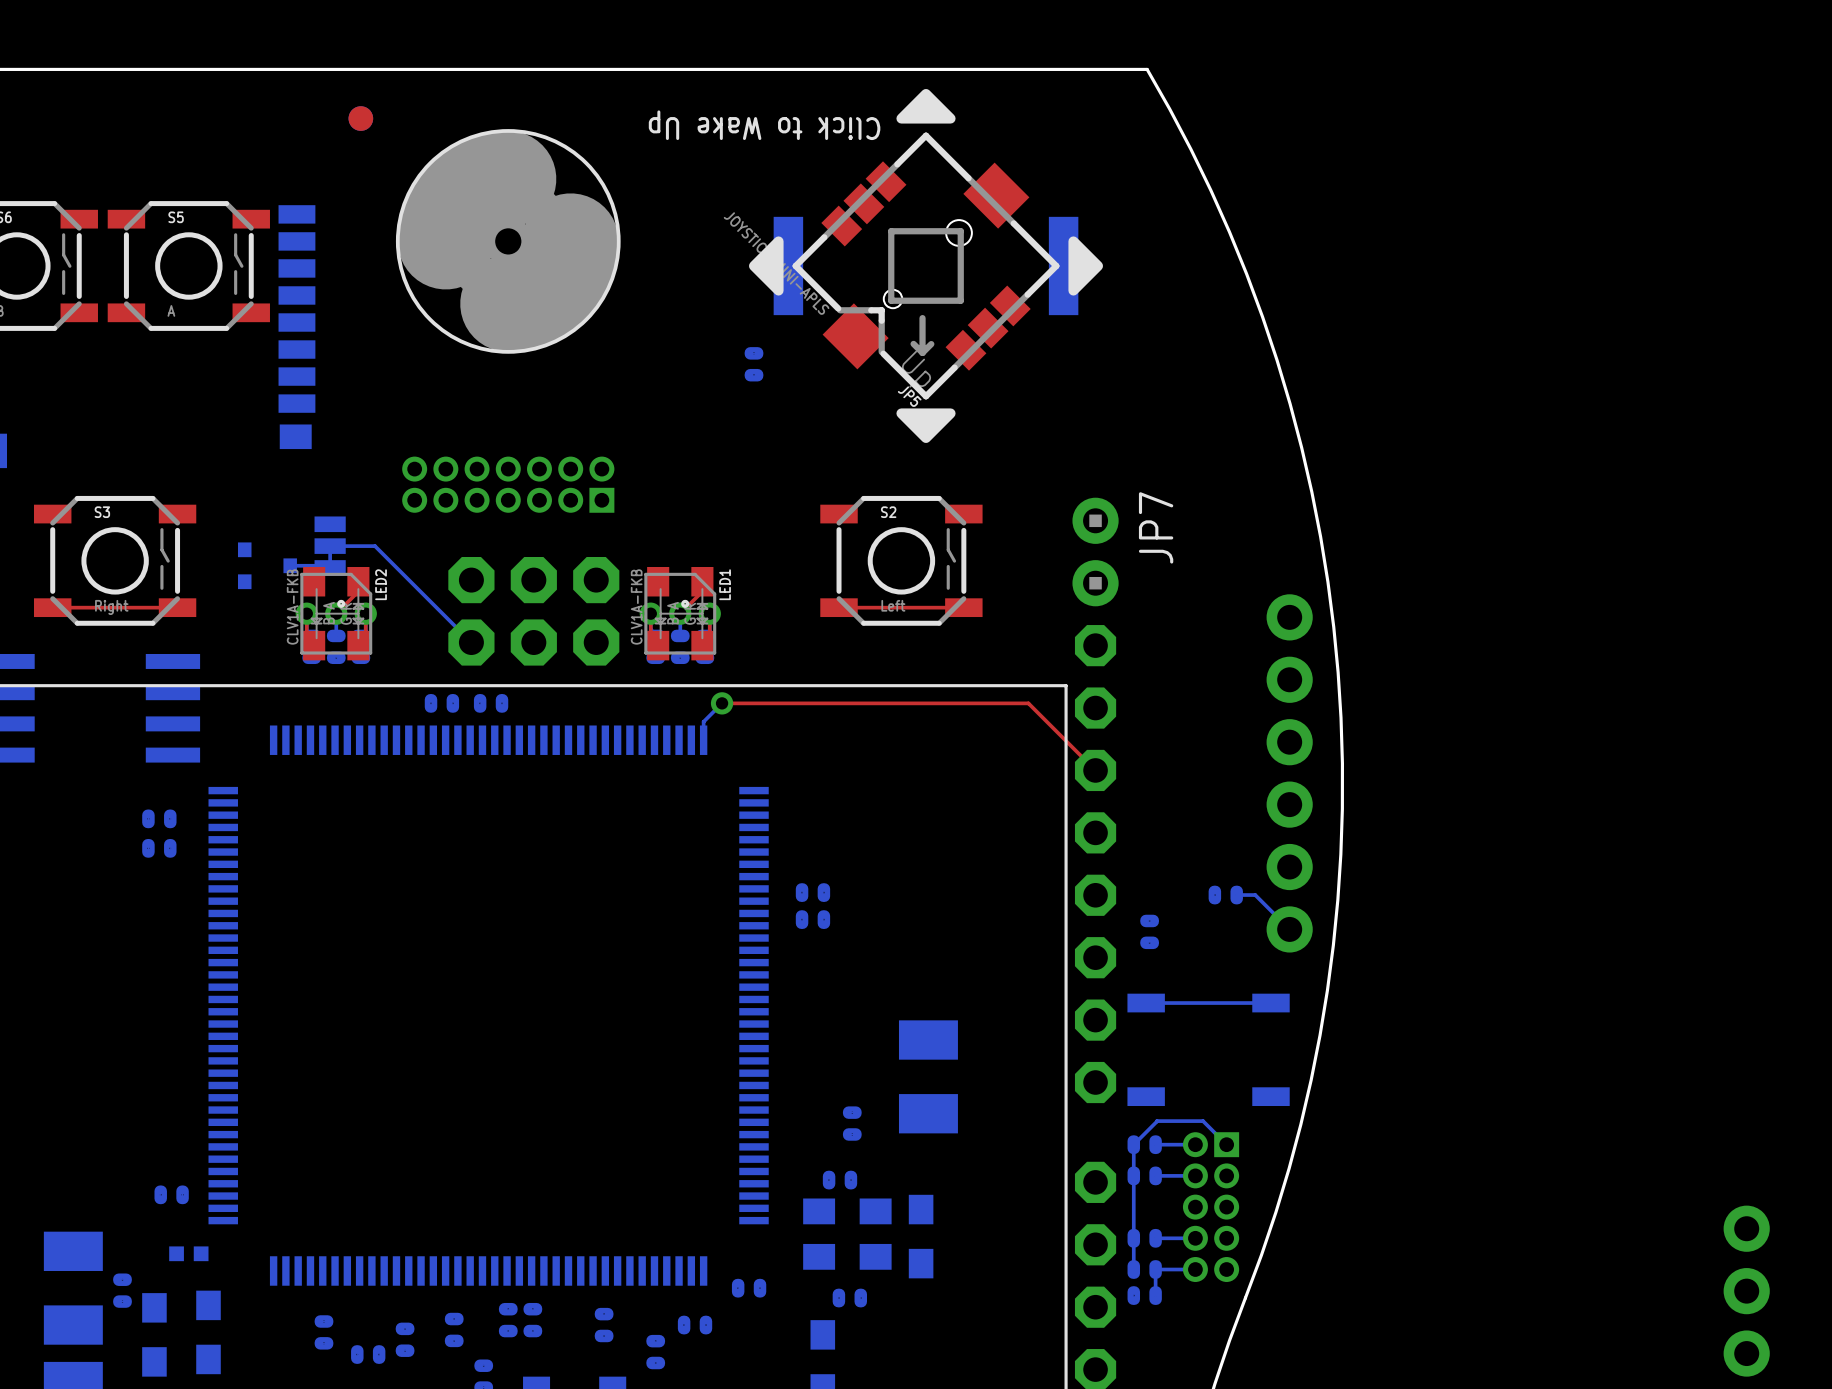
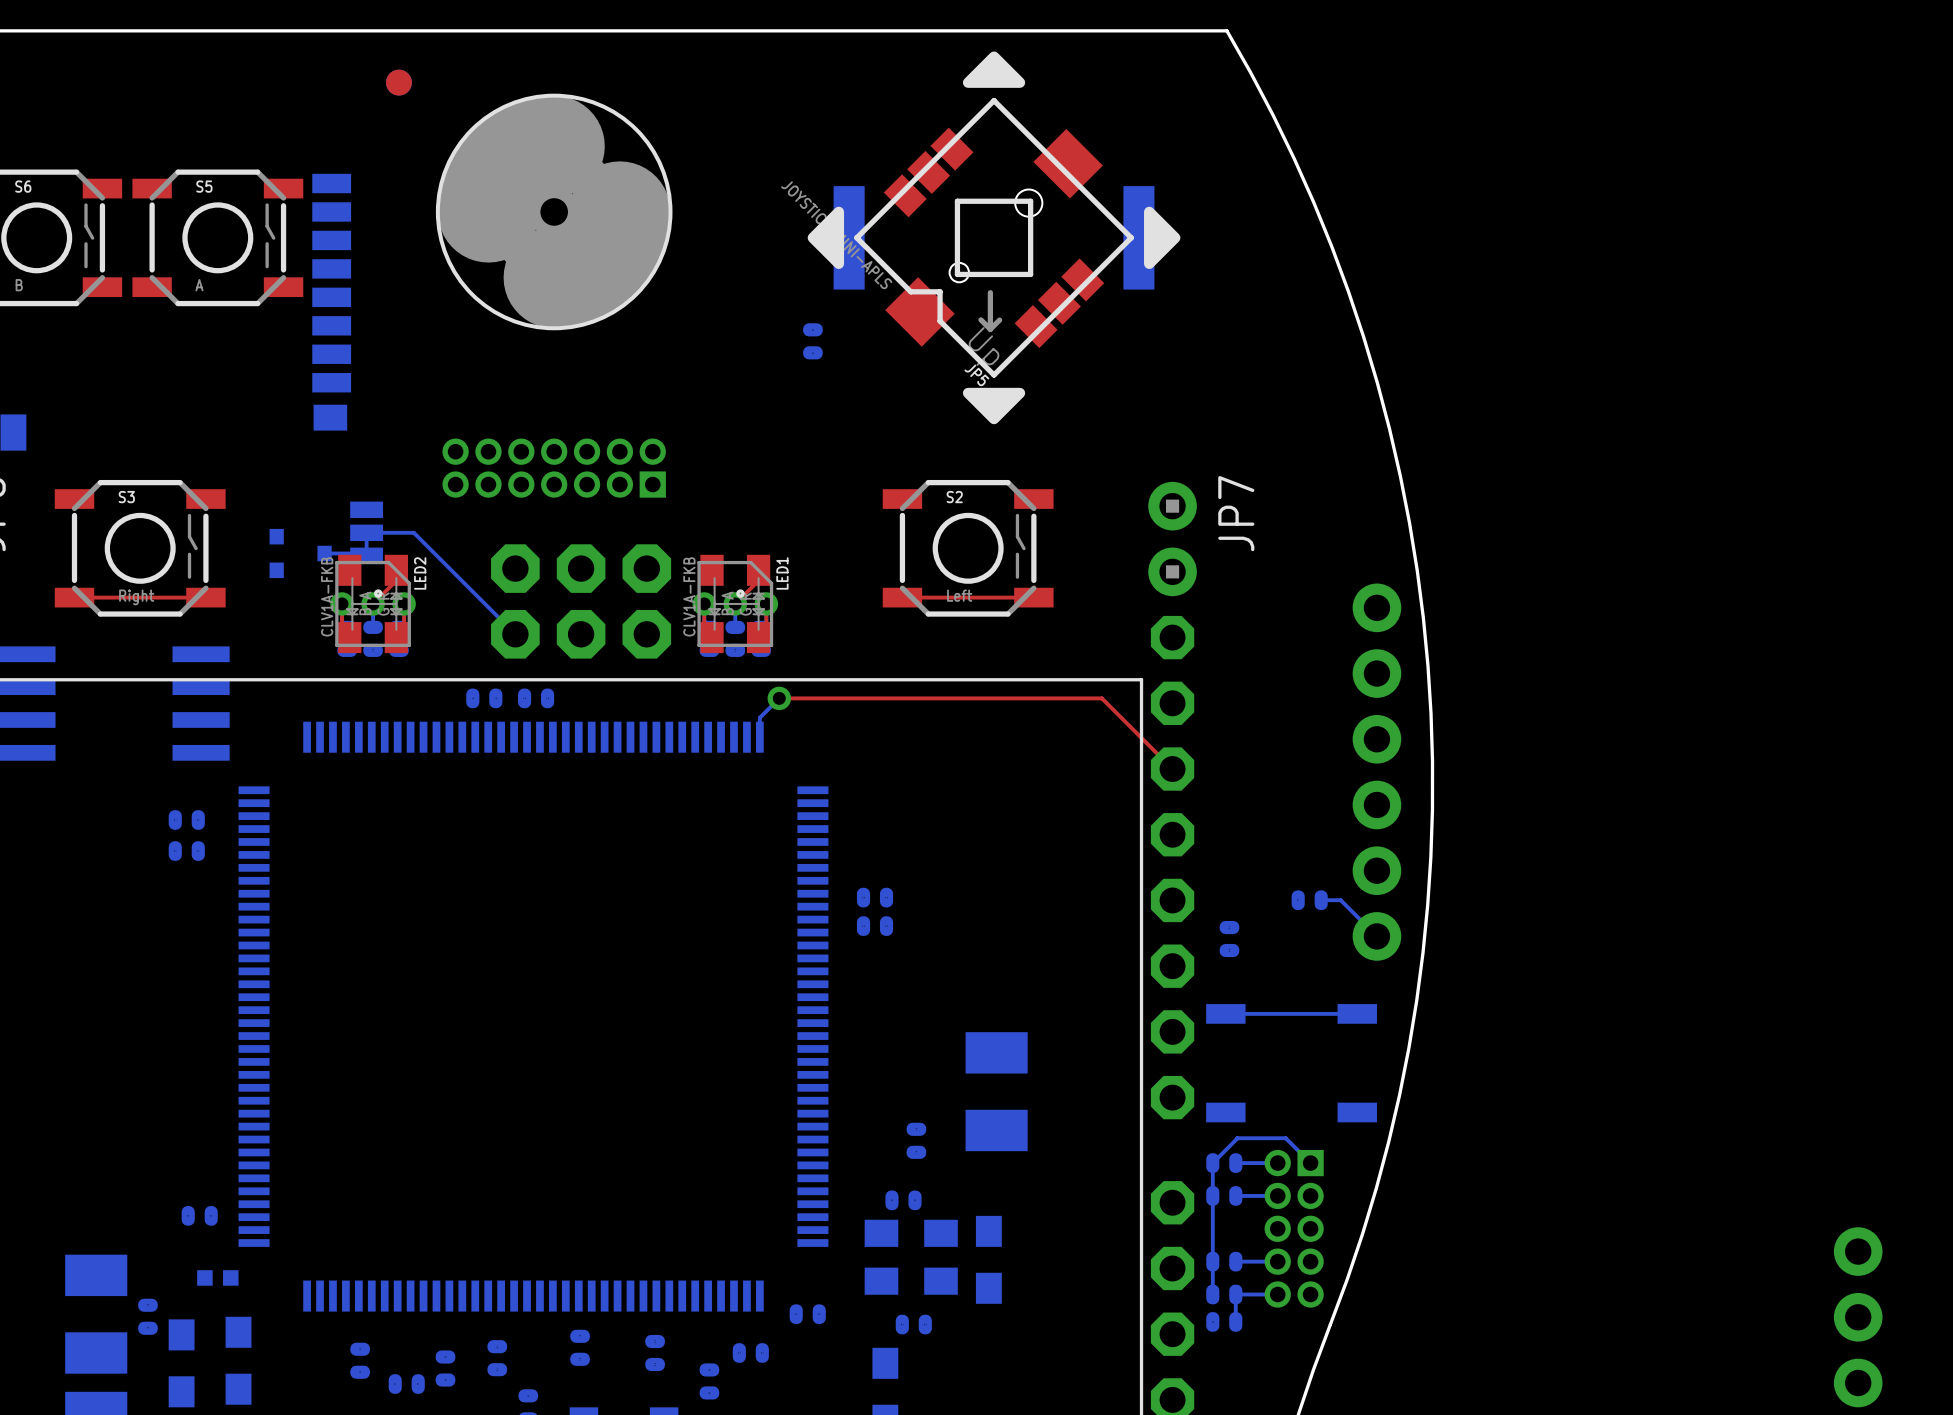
text: Click to Wake Up (764, 125) -> none
JP5 footprint: [792, 132, 1060, 400] -> [854, 98, 1134, 378]
part: (508, 1320) -> none

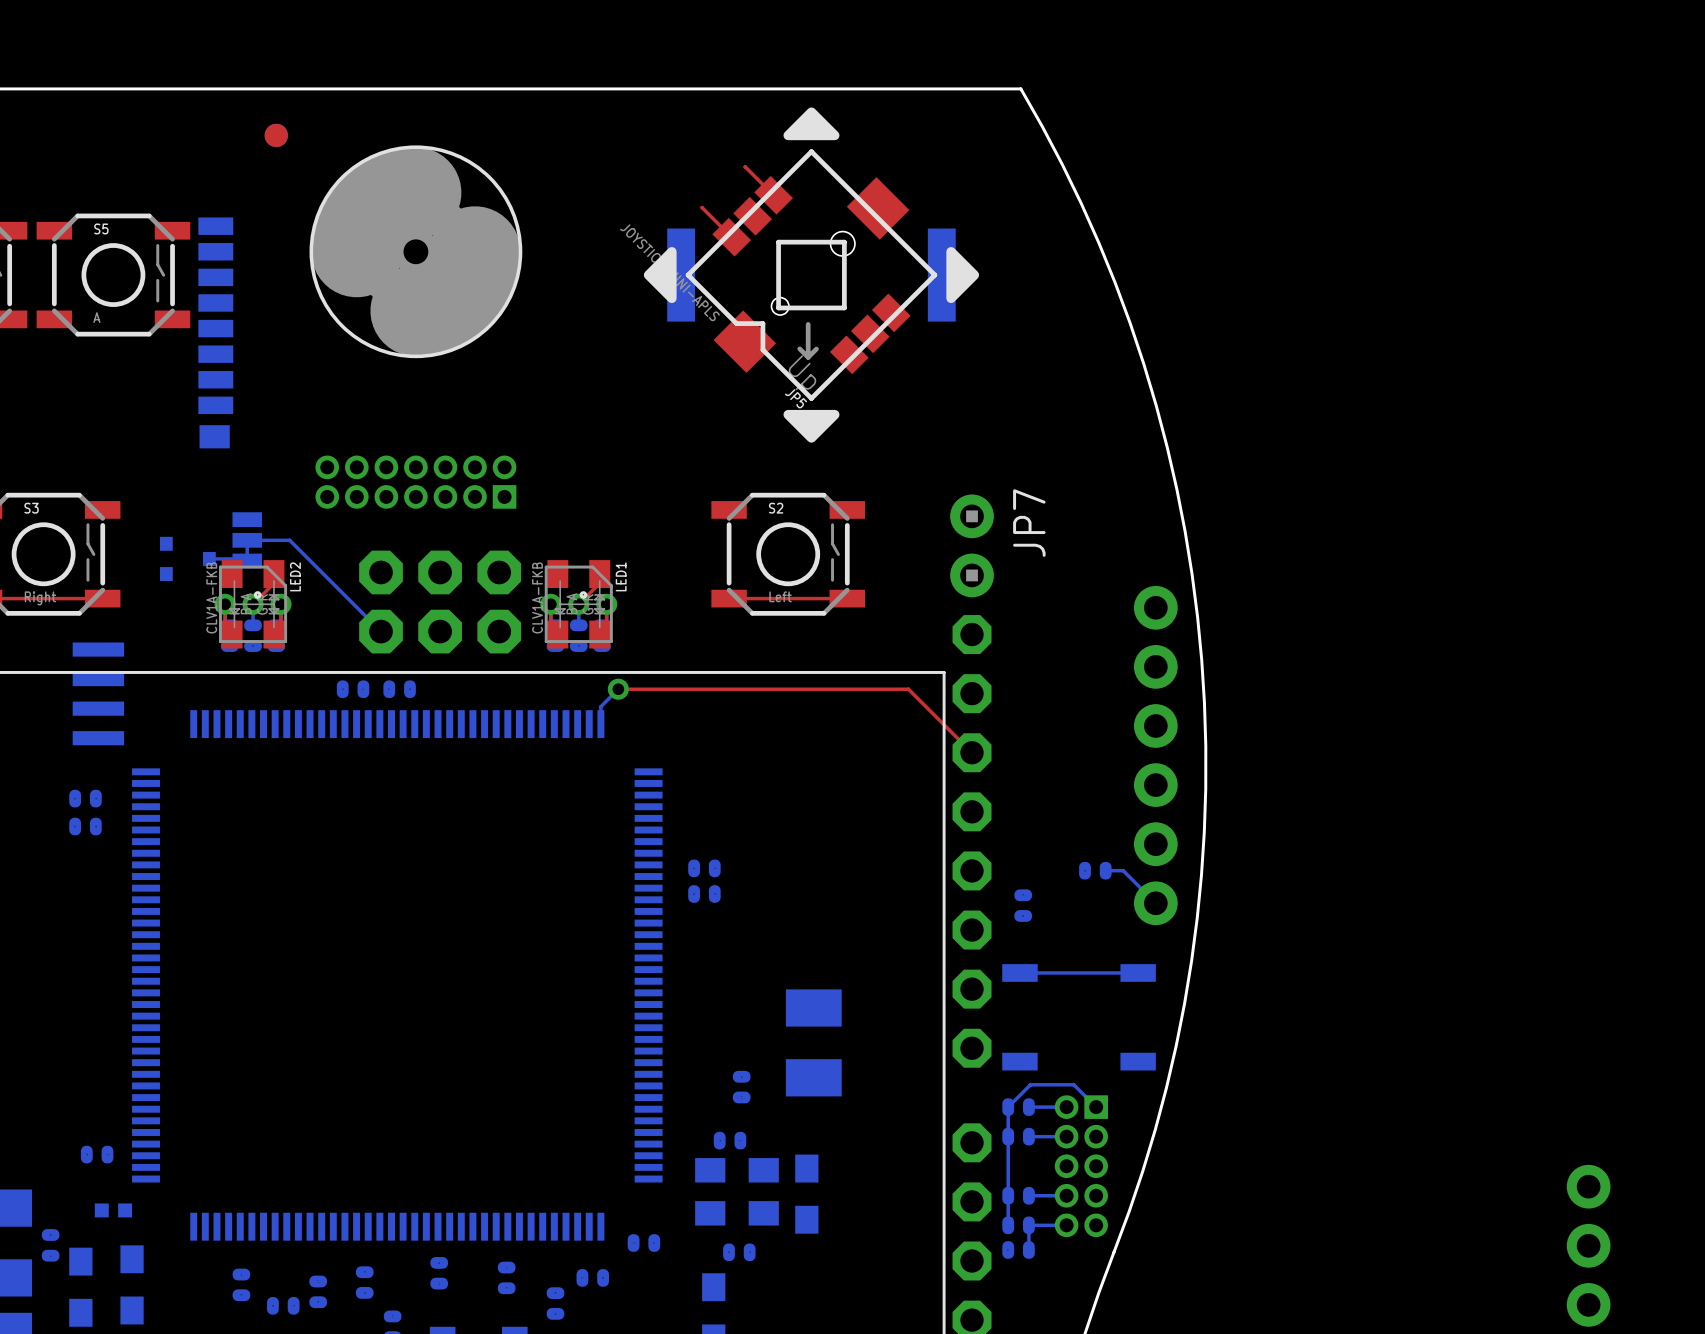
top track: none -> (745, 166) (773, 195)
top track: none -> (702, 207) (731, 237)
part: (812, 341) -> none

